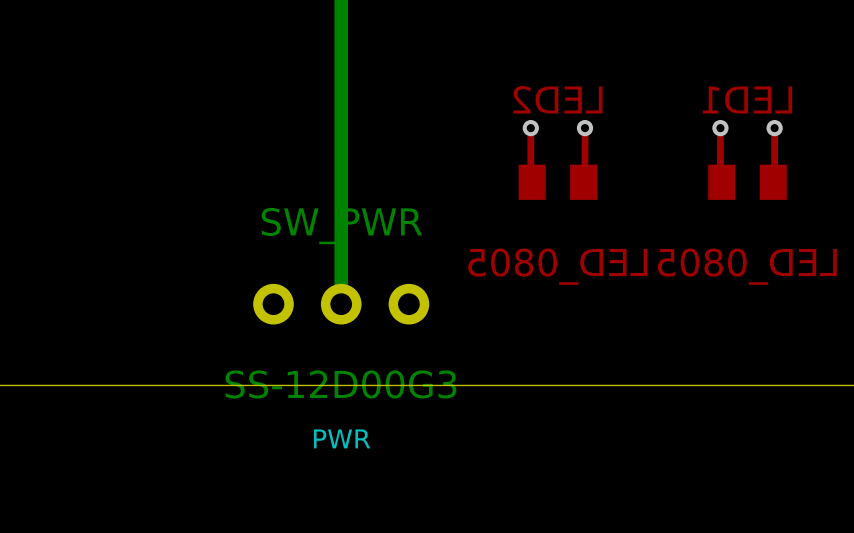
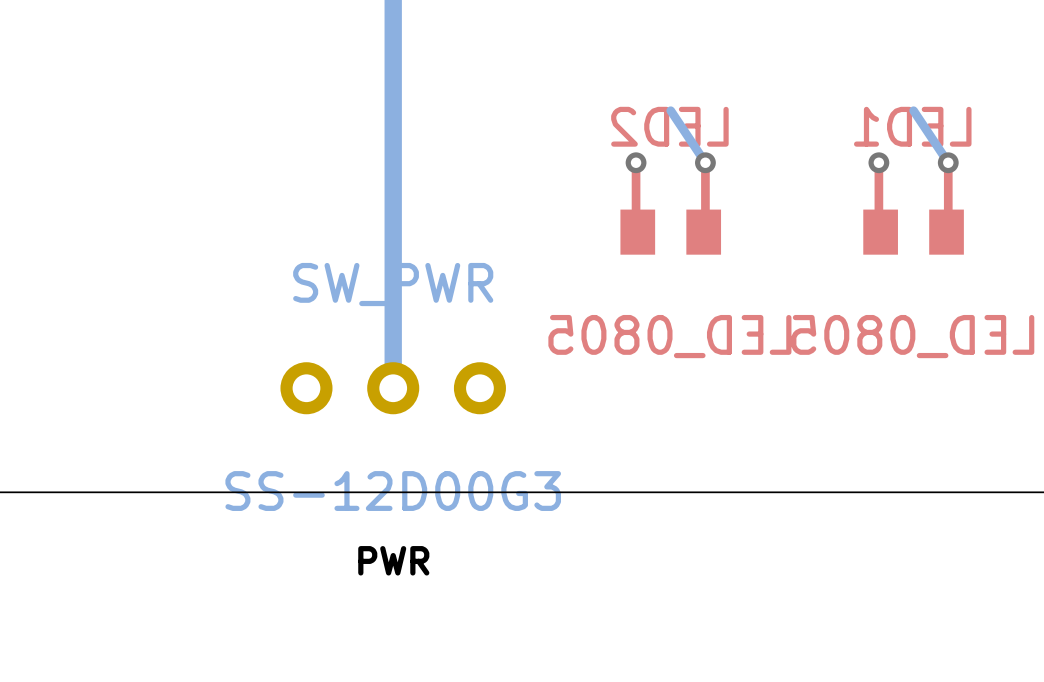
bottom track: none -> (670, 110) (705, 162)
bottom track: none -> (913, 110) (948, 162)

